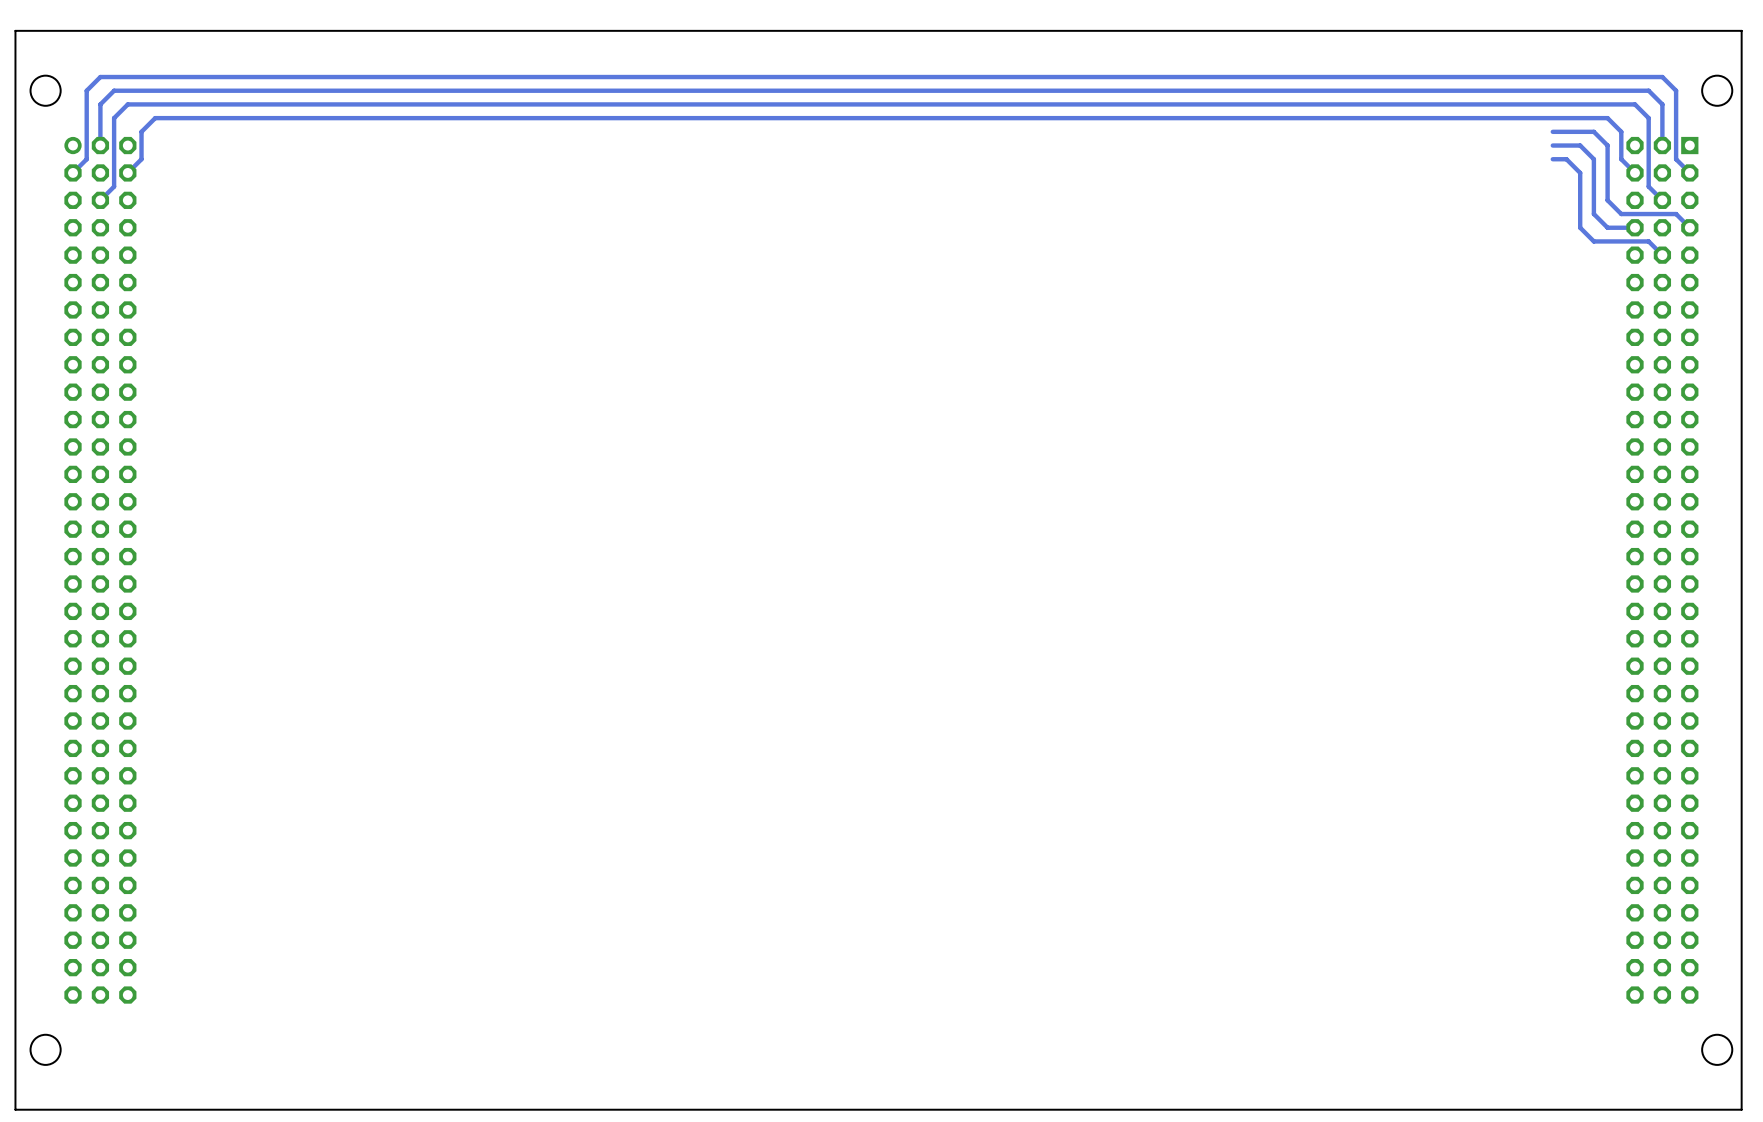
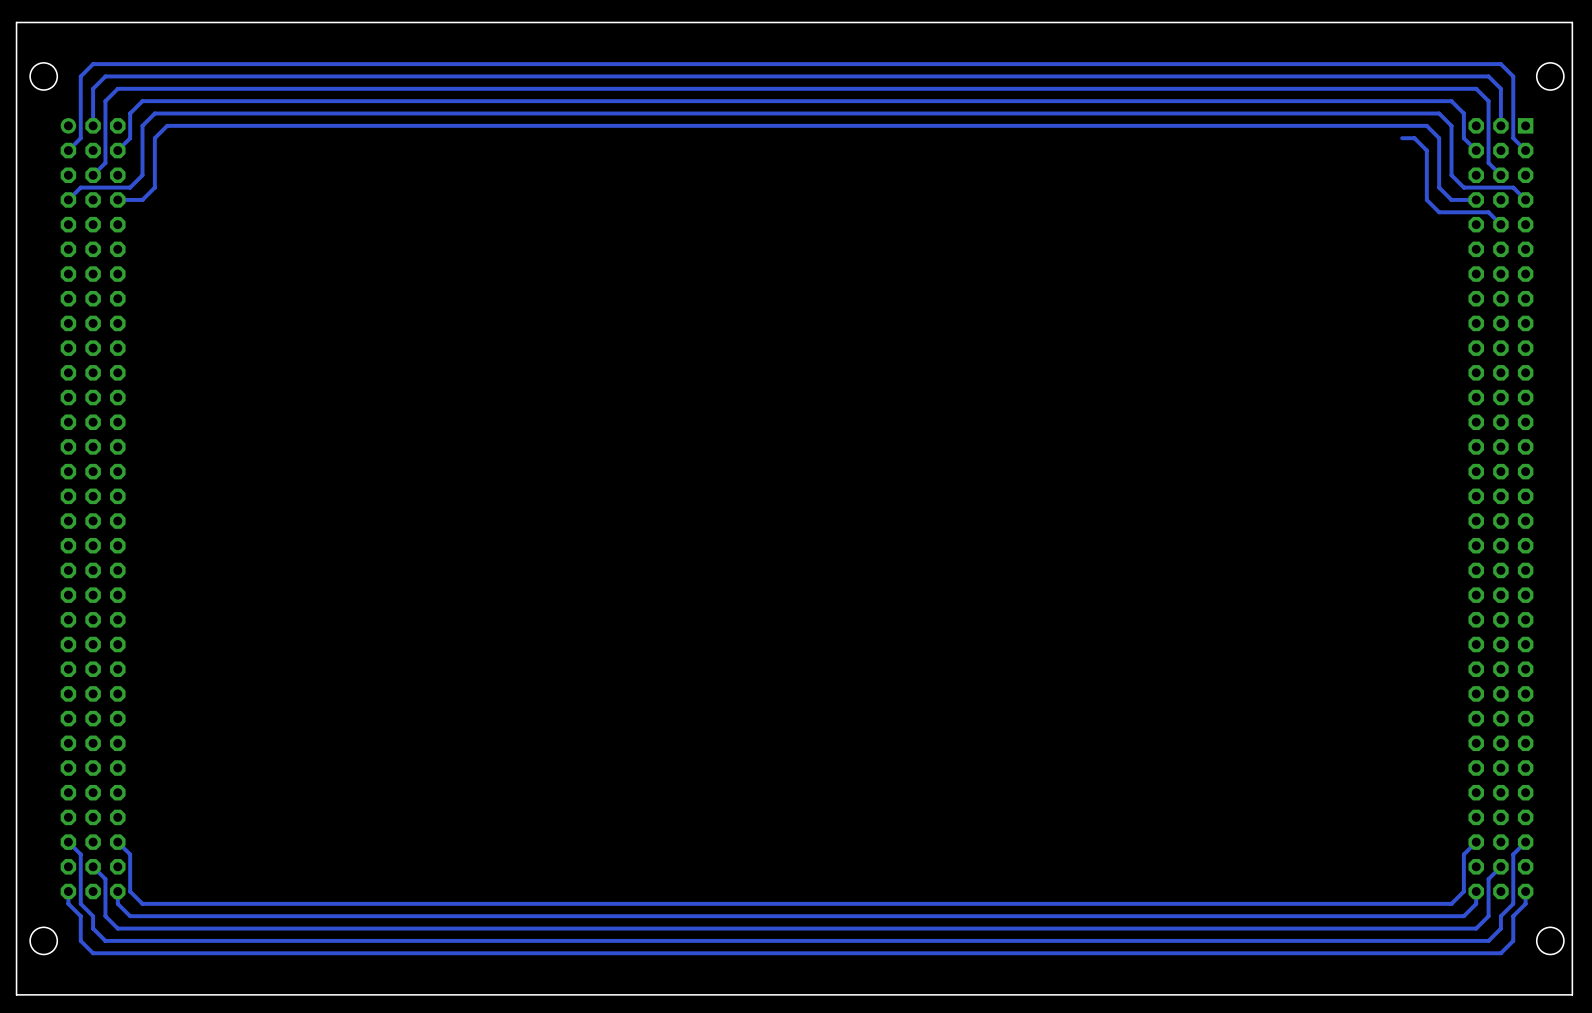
track: none -> (1402, 113) (154, 113) (142, 125) (142, 175) (130, 187) (80, 187) (68, 199)
track: none -> (1402, 125) (167, 125) (154, 138) (154, 187) (142, 199) (117, 199)
track: none -> (1476, 842) (1463, 854) (1463, 891) (1451, 903) (142, 903) (130, 891) (130, 854) (117, 842)
track: none -> (1525, 842) (1513, 854) (1513, 903) (1500, 916) (1500, 928) (1488, 940) (105, 940) (93, 928) (93, 916) (80, 903) (80, 854) (68, 842)
track: none -> (1500, 866) (1488, 879) (1488, 916) (1476, 928) (117, 928) (105, 916) (105, 879) (93, 866)
track: none -> (1476, 891) (1476, 903) (1463, 916) (130, 916) (117, 903) (117, 891)
track: none -> (1525, 891) (1525, 903) (1513, 916) (1513, 940) (1500, 953) (93, 953) (80, 940) (80, 916) (68, 903) (68, 891)

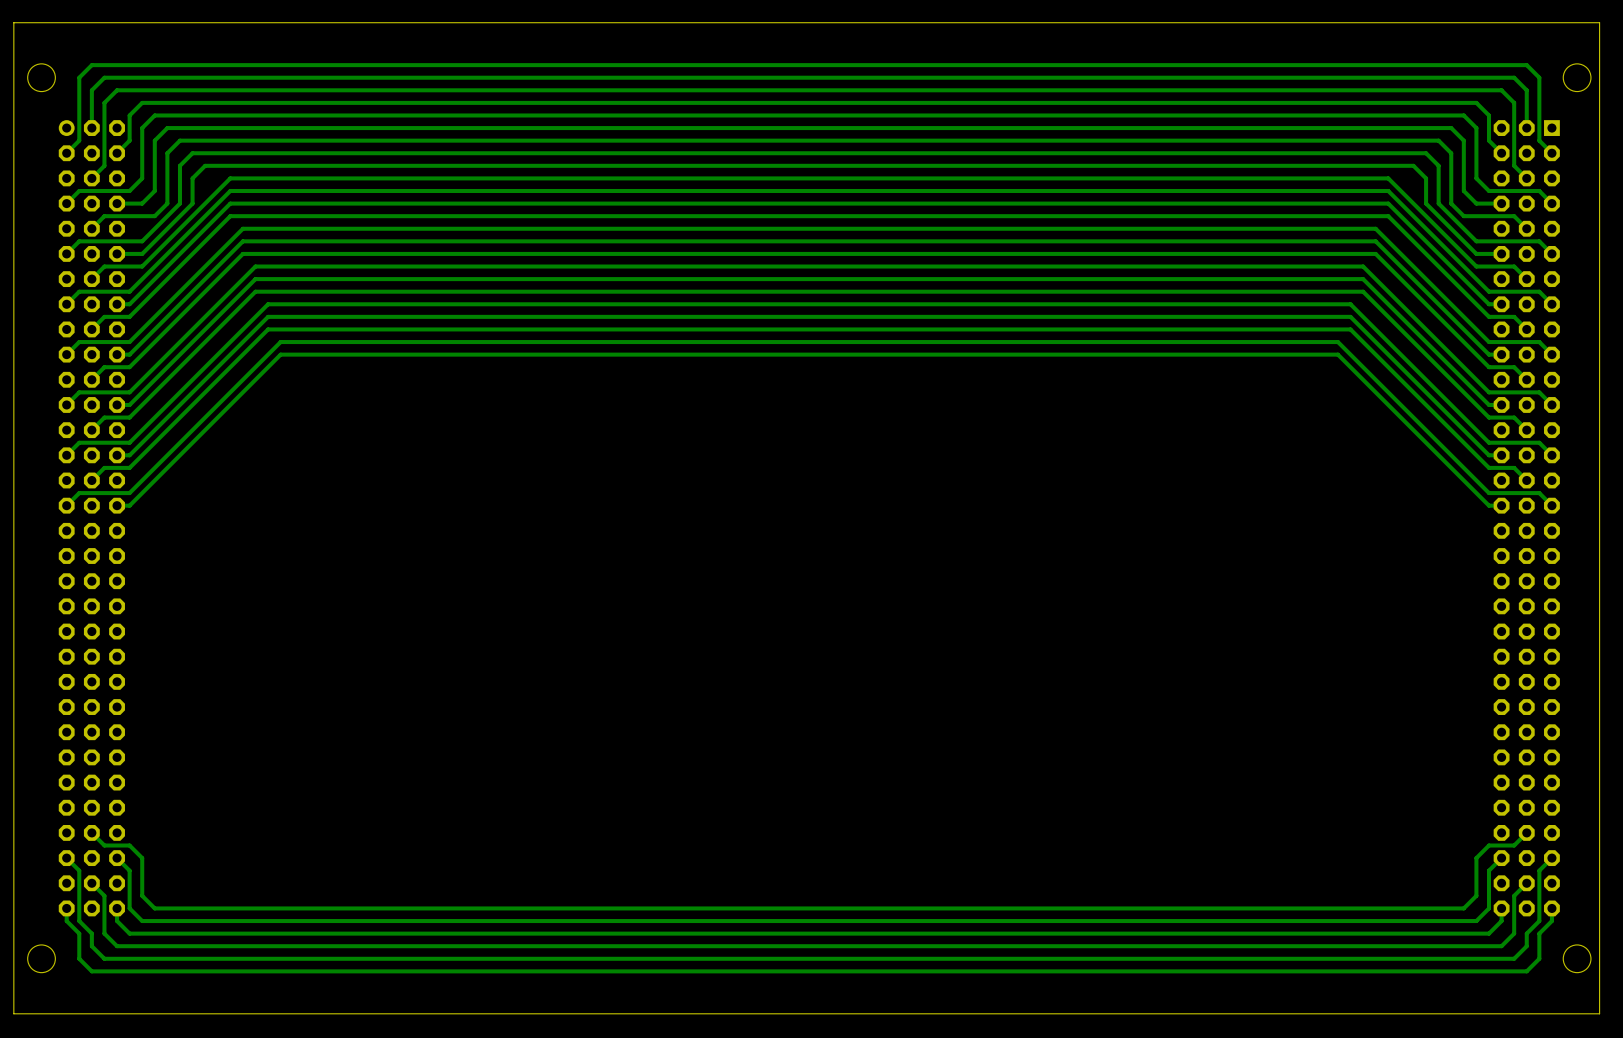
track: none -> (1426, 140) (179, 140) (167, 153) (167, 203) (154, 216) (104, 216) (91, 228)
track: none -> (1501, 253) (1476, 253) (1426, 203) (1426, 178) (1413, 165) (205, 165) (192, 178) (192, 203) (142, 253) (117, 253)
track: none -> (1551, 253) (1539, 241) (1476, 241) (1438, 203) (1438, 165) (1426, 153) (192, 153) (179, 165) (179, 203) (142, 241) (79, 241) (66, 253)
track: none -> (1526, 279) (1514, 266) (1476, 266) (1388, 178) (230, 178) (142, 266) (104, 266) (91, 279)
track: none -> (1501, 304) (1489, 304) (1388, 203) (230, 203) (129, 304) (117, 304)
track: none -> (1551, 304) (1539, 291) (1489, 291) (1388, 190) (230, 190) (129, 291) (79, 291) (66, 304)
track: none -> (1526, 329) (1514, 316) (1489, 316) (1388, 216) (230, 216) (129, 316) (104, 316) (91, 329)
track: none -> (1501, 354) (1489, 354) (1375, 241) (242, 241) (129, 354) (117, 354)
track: none -> (1551, 354) (1539, 342) (1489, 342) (1375, 228) (242, 228) (129, 342) (79, 342) (66, 354)
track: none -> (1526, 379) (1514, 367) (1489, 367) (1375, 253) (242, 253) (129, 367) (104, 367) (91, 379)
track: none -> (1501, 404) (1489, 404) (1363, 279) (255, 279) (129, 404) (117, 404)
track: none -> (1551, 404) (1539, 392) (1489, 392) (1363, 266) (255, 266) (129, 392) (79, 392) (66, 404)
track: none -> (1526, 430) (1514, 417) (1489, 417) (1363, 291) (255, 291) (129, 417) (104, 417) (91, 430)
track: none -> (1501, 455) (1489, 455) (1350, 316) (268, 316) (129, 455) (117, 455)
track: none -> (1551, 455) (1539, 442) (1489, 442) (1350, 304) (268, 304) (129, 442) (79, 442) (66, 455)
track: none -> (1526, 480) (1514, 467) (1489, 467) (1350, 329) (268, 329) (129, 467) (104, 467) (91, 480)
track: none -> (1501, 505) (1489, 505) (1337, 354) (280, 354) (129, 505) (117, 505)
track: none -> (1551, 505) (1539, 493) (1489, 493) (1337, 342) (280, 342) (129, 493) (79, 493) (66, 505)
track: none -> (1526, 832) (1514, 845) (1489, 845) (1476, 858) (1476, 895) (1463, 908) (154, 908) (142, 895) (142, 858) (129, 845) (104, 845) (91, 832)

